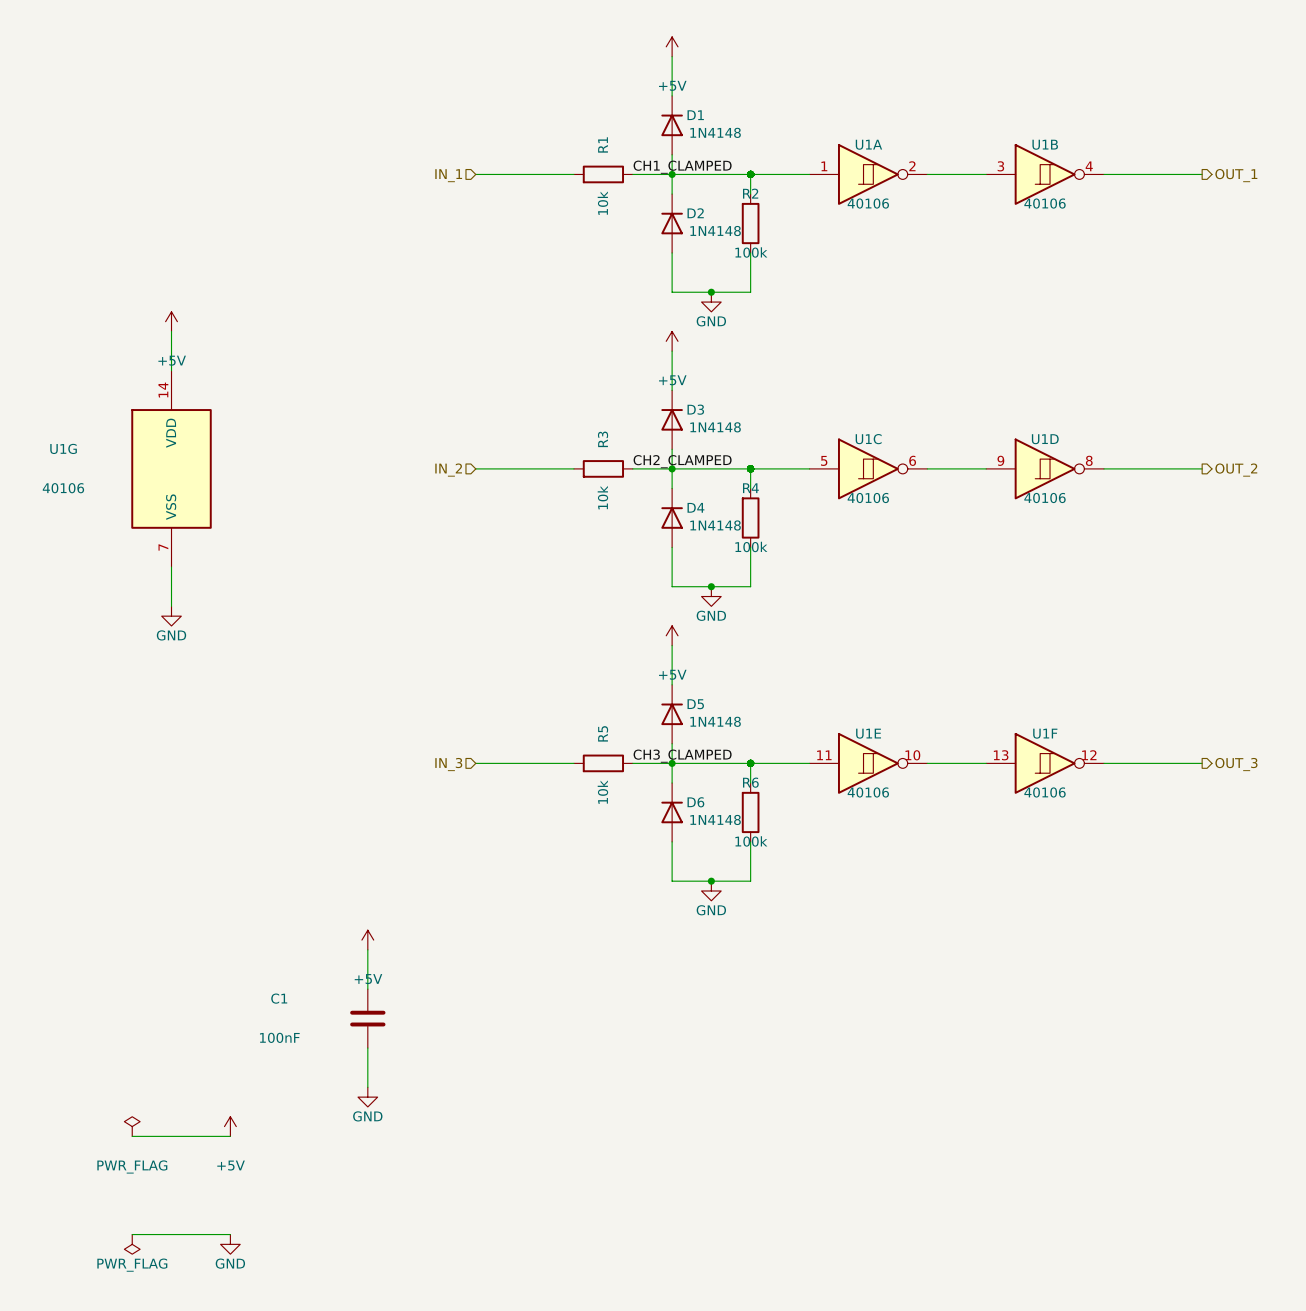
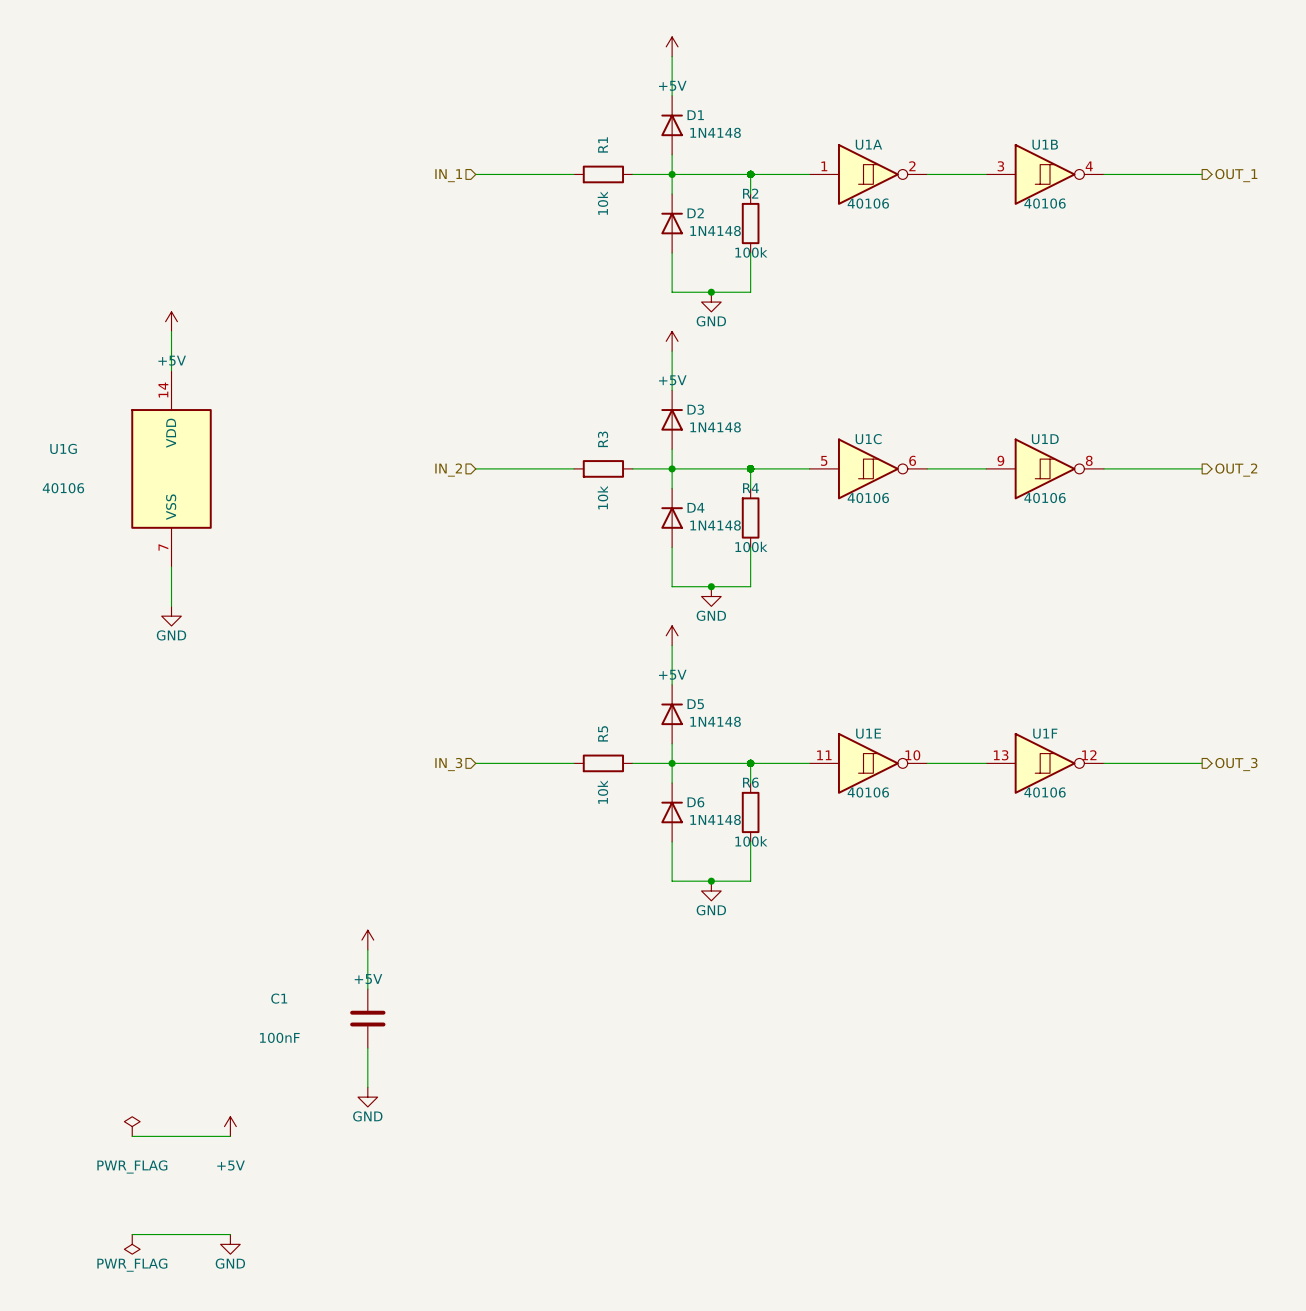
label: CH1_CLAMPED (682, 167) -> none
label: CH2_CLAMPED (682, 461) -> none
label: CH3_CLAMPED (682, 756) -> none

